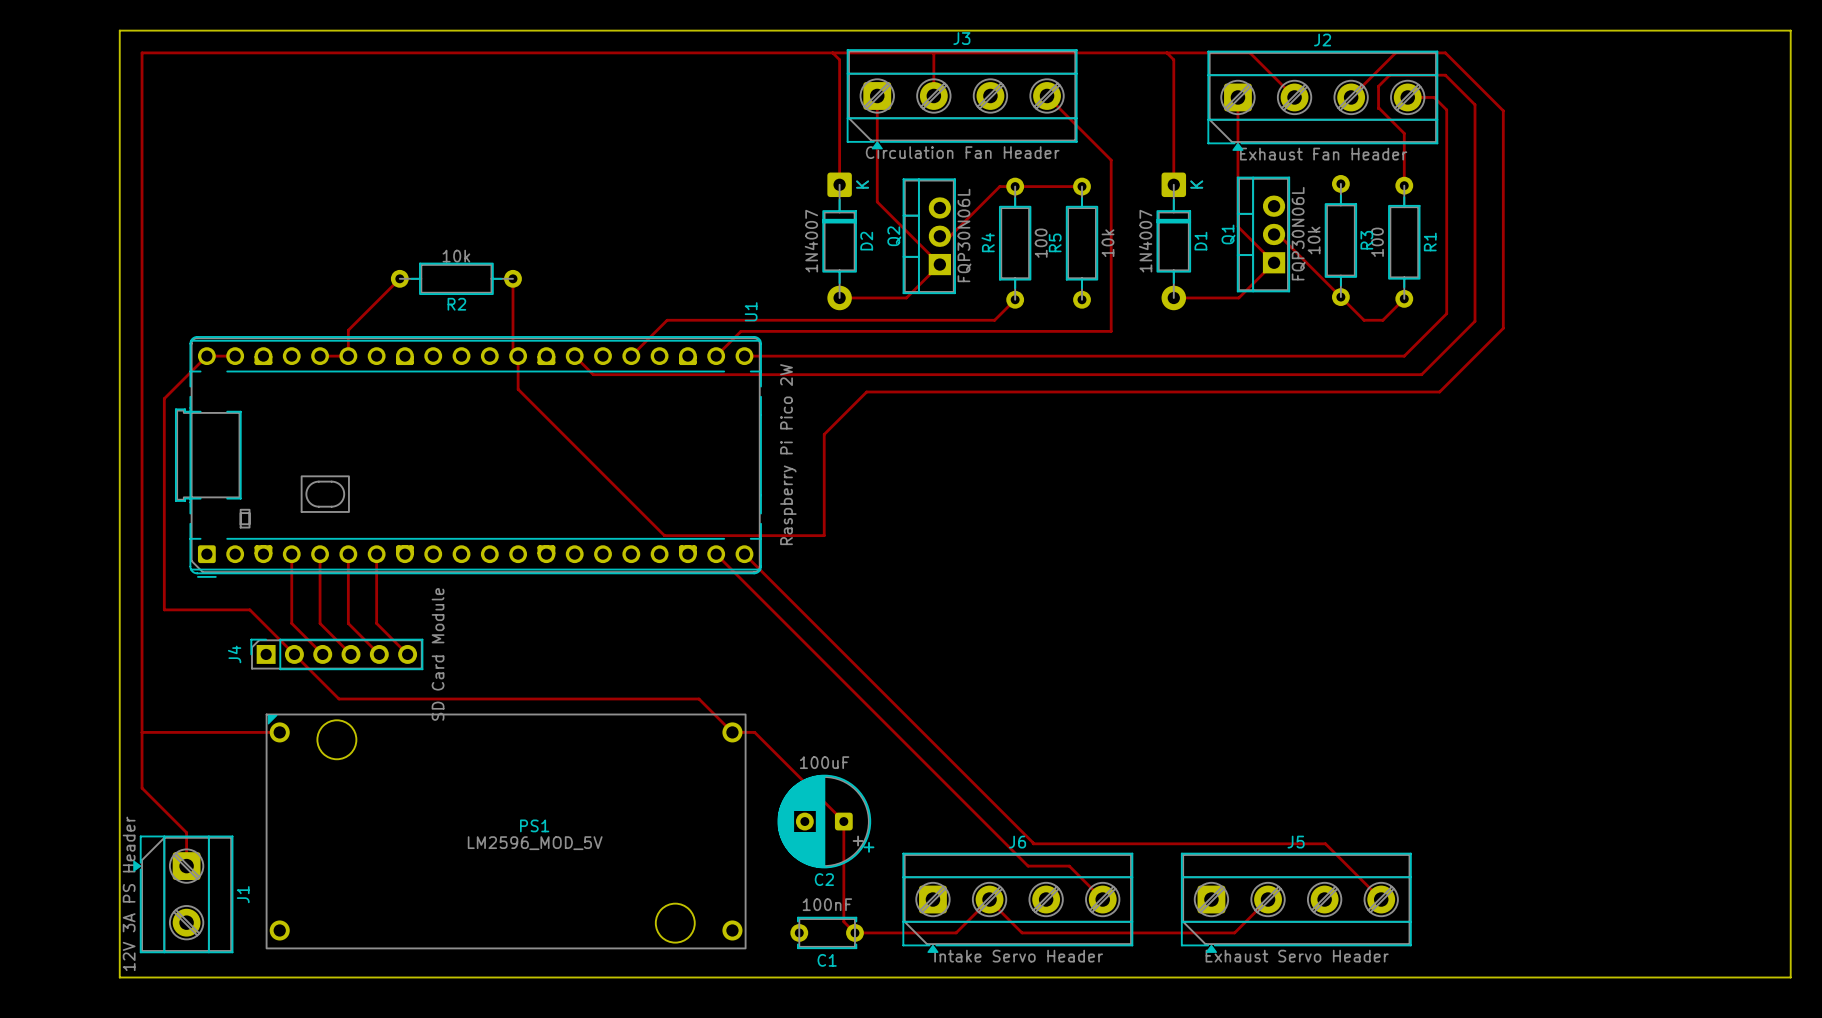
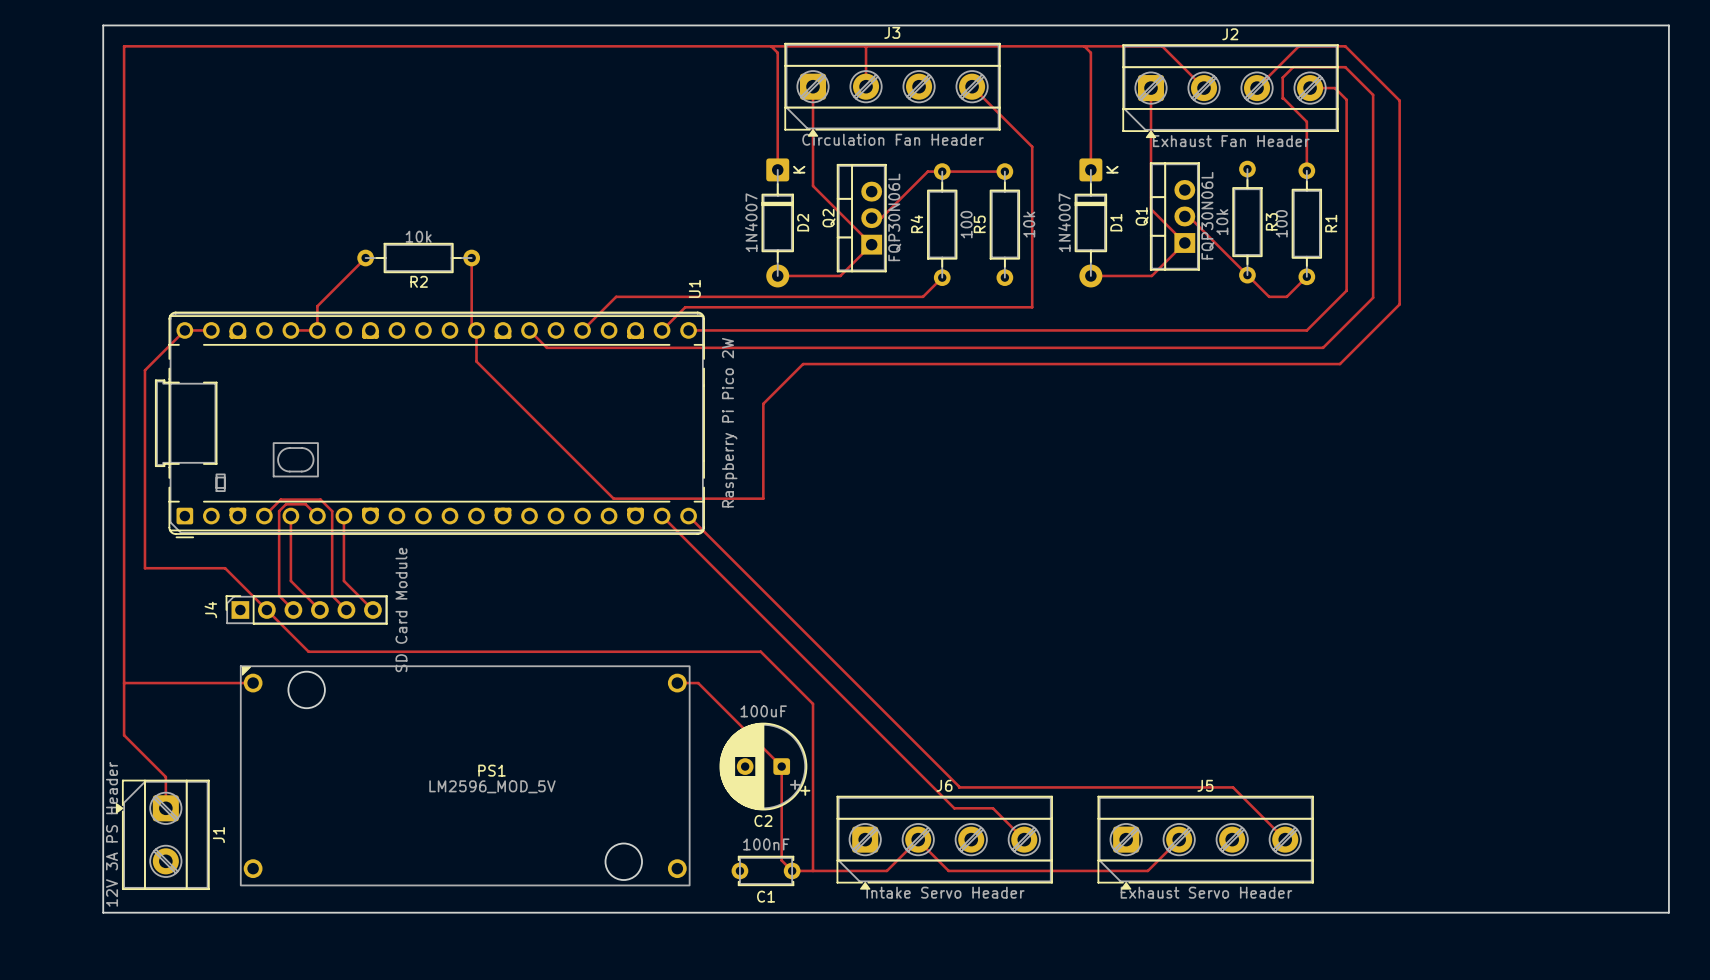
track: (291, 554) (291, 623) (307, 639) -> (264, 516) (280, 499) (320, 499) (332, 511) (332, 595)
track: (348, 554) (348, 623) (364, 639) -> (317, 516) (305, 504) (286, 504) (279, 511) (279, 595)
track: (699, 699) (732, 732) -> (646, 651) (760, 651) (813, 703) (813, 870)

